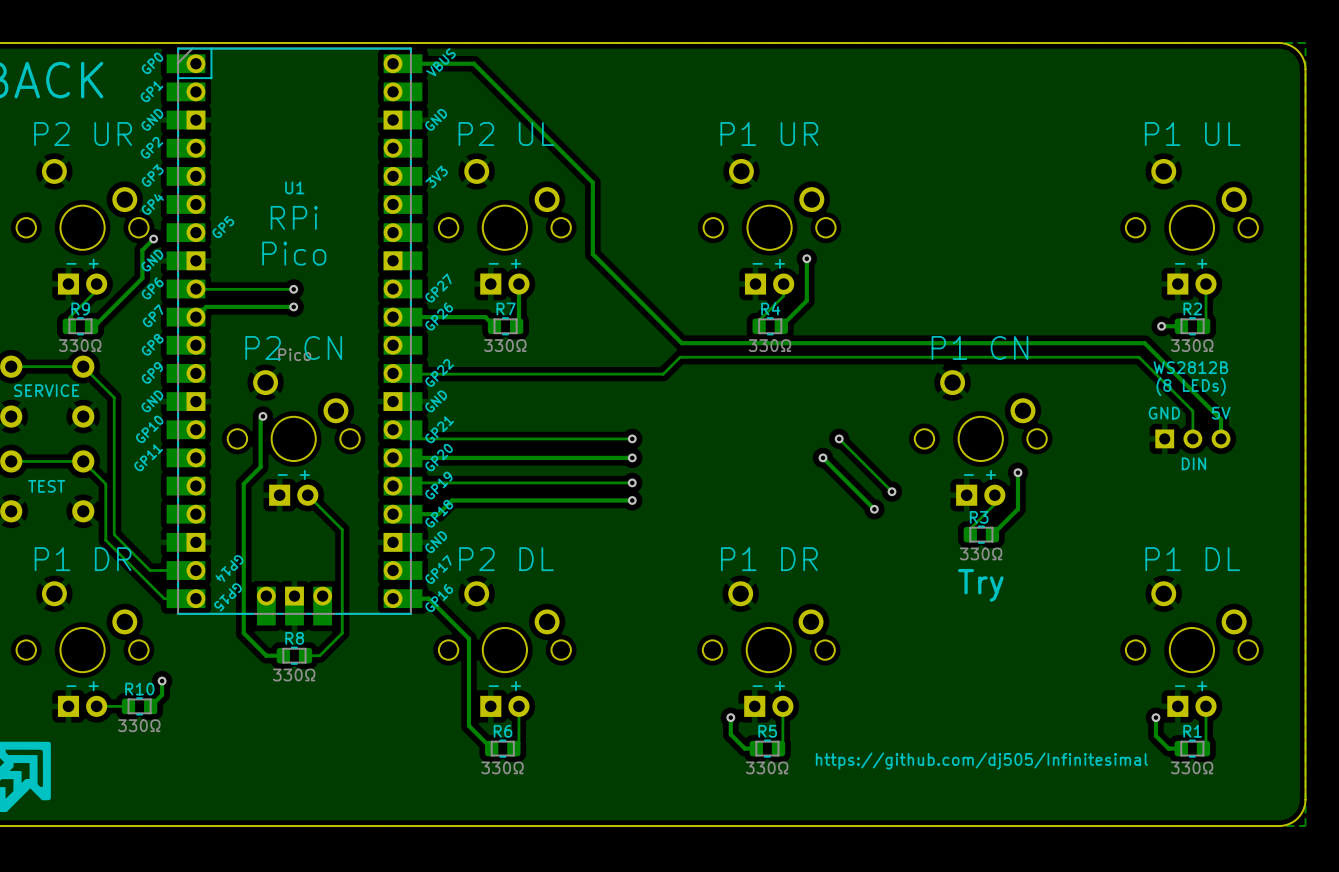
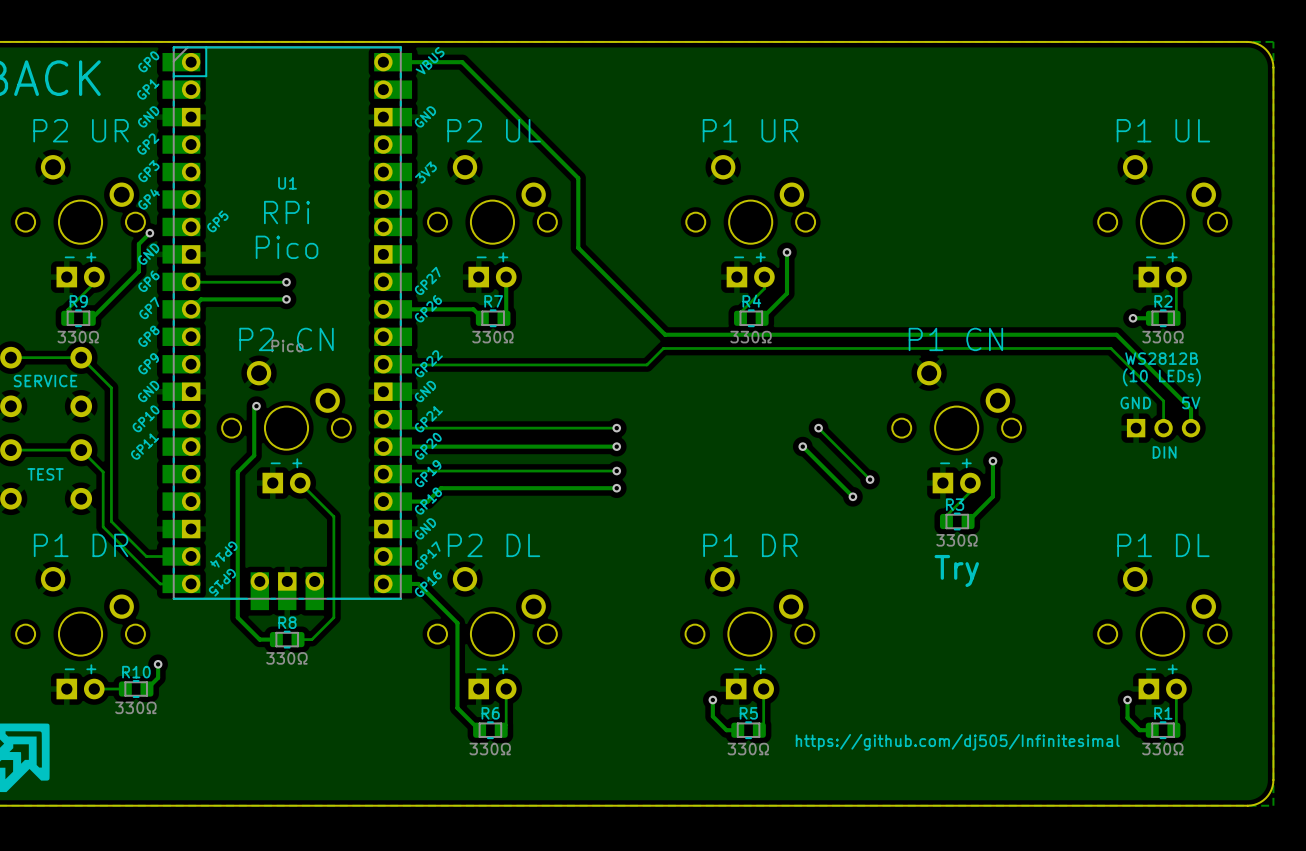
text: (8 LEDs) (1191, 386) -> (10 LEDs) (1161, 377)

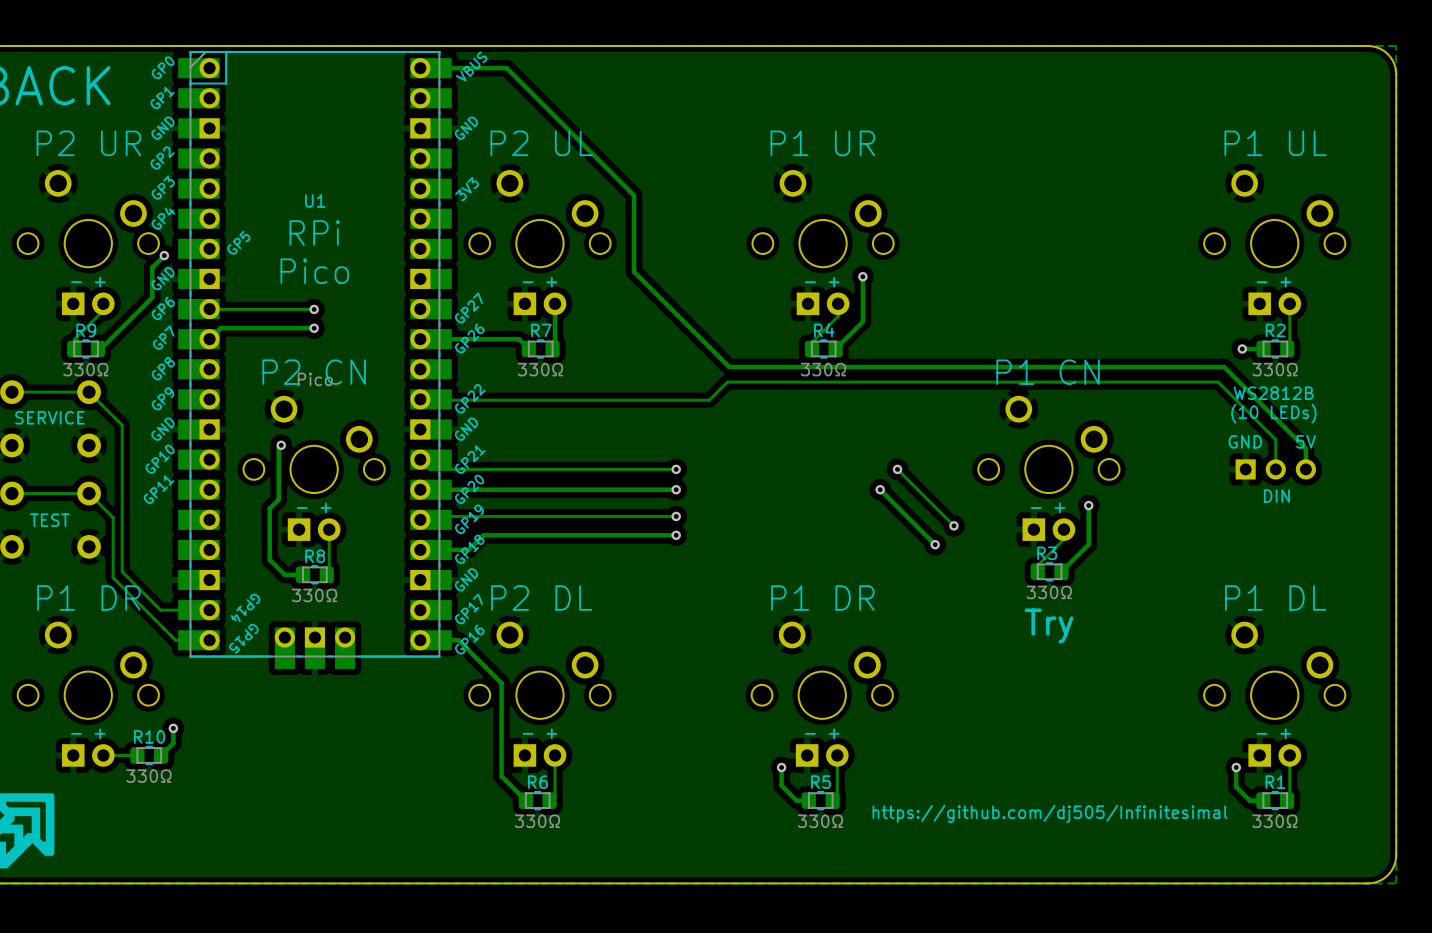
track: (246, 463) (237, 472) (237, 617) (259, 639) (276, 639) -> (269, 508) (269, 559) (284, 574) (303, 574)
track: (300, 483) (333, 516) (333, 617) (311, 639) (298, 639) -> (329, 529) (329, 572) (326, 574)
R8 position: (287, 639) -> (314, 574)

